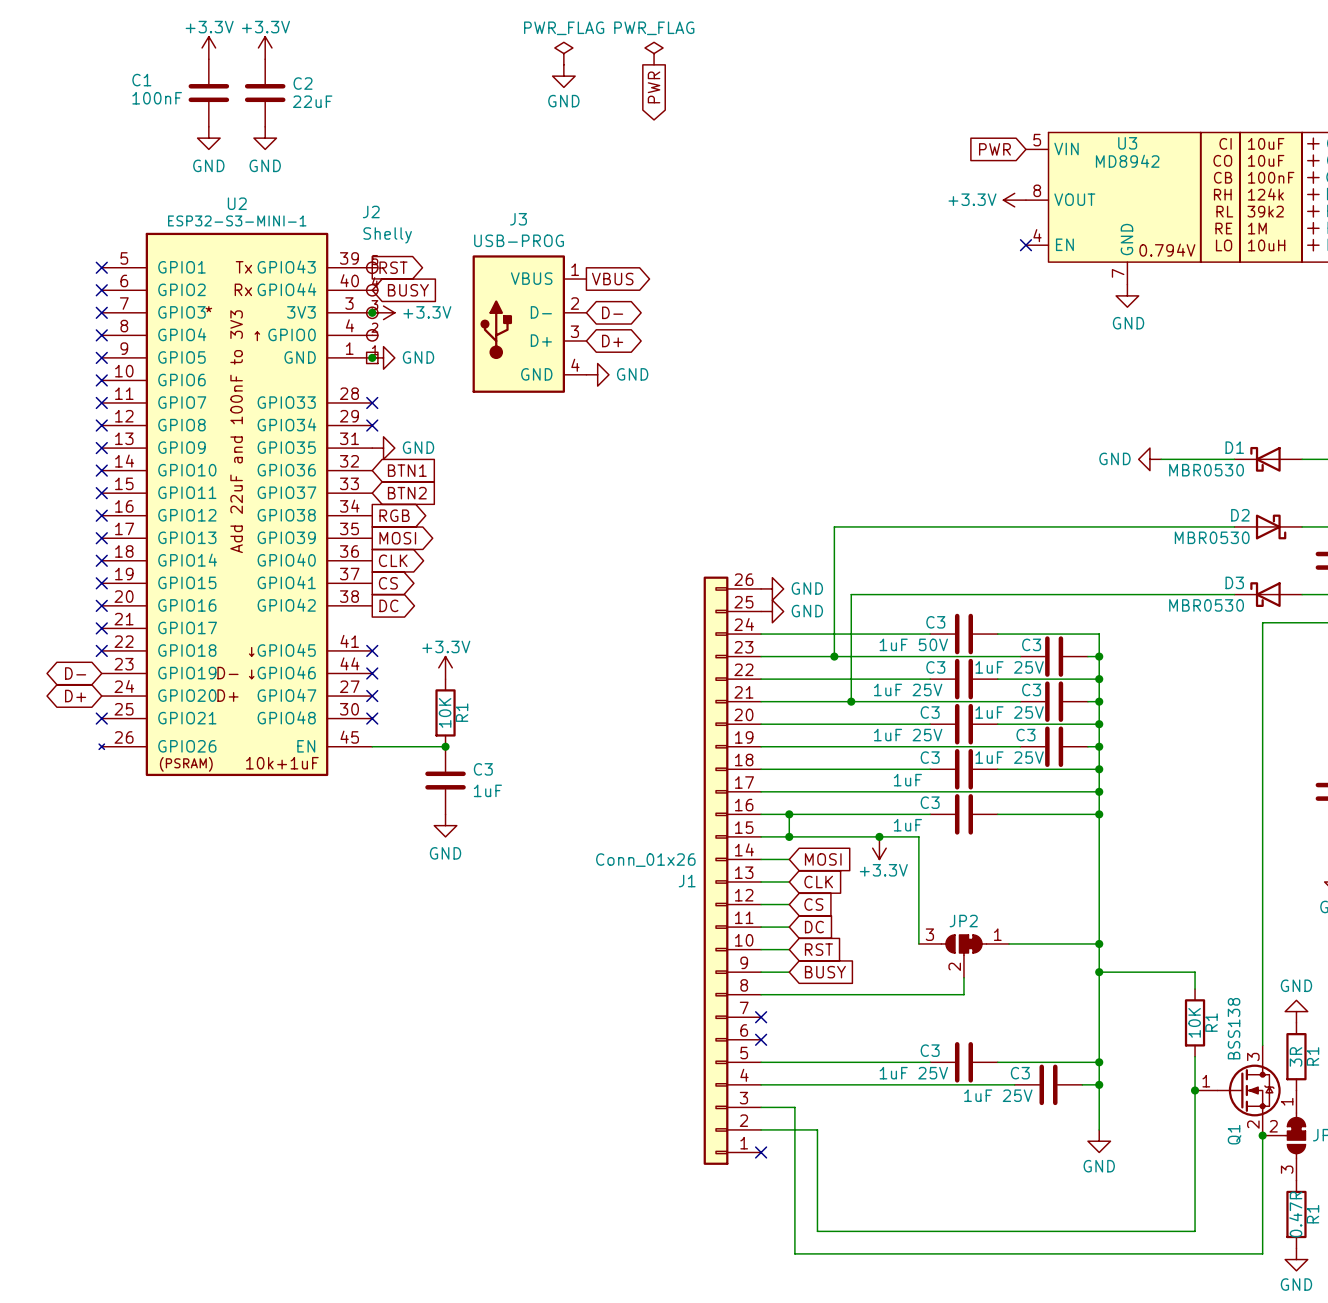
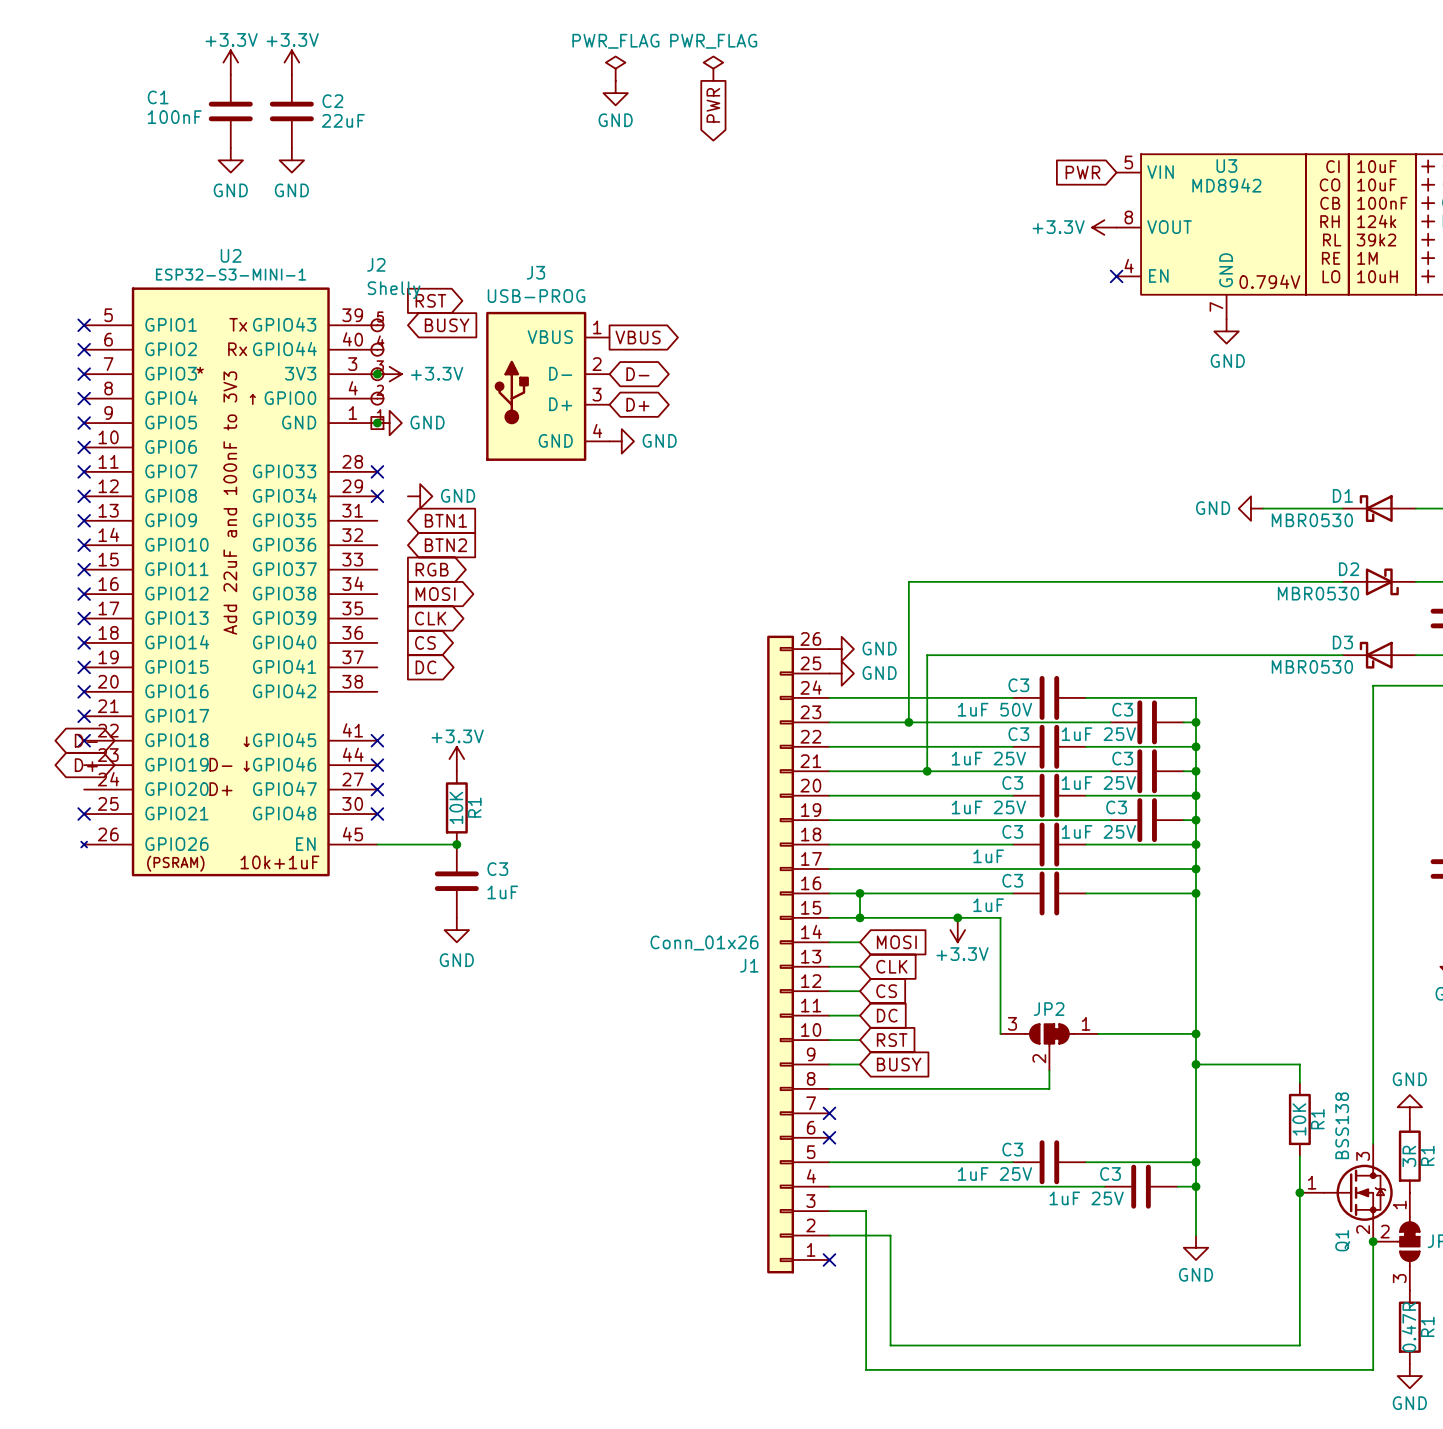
no-connect mark: (101, 267) -> none
global label position: VBUS (612, 279) -> VBUS (638, 337)
no-connect mark: none -> (84, 325)
no-connect mark: (101, 290) -> none
no-connect mark: none -> (84, 349)
no-connect mark: (101, 312) -> none
junction: (372, 312) -> none
J2 position: (372, 312) -> (377, 374)
power symbol position: +3.3V (383, 312) -> +3.3V (389, 374)
global label position: D- (612, 312) -> D- (637, 374)
J3 position: (529, 324) -> (547, 386)
no-connect mark: none -> (84, 374)
no-connect mark: (101, 335) -> none
junction: none -> (377, 374)
global label position: D+ (612, 341) -> D+ (637, 404)
no-connect mark: none -> (84, 398)
no-connect mark: (101, 357) -> none
junction: (372, 357) -> none
power symbol position: GND (383, 357) -> GND (389, 423)
power symbol position: GND (597, 374) -> GND (621, 441)
no-connect mark: none -> (84, 423)
no-connect mark: (101, 380) -> none
junction: none -> (377, 423)
no-connect mark: none -> (84, 447)
no-connect mark: (101, 402) -> none
no-connect mark: (372, 402) -> none
no-connect mark: none -> (84, 471)
no-connect mark: (101, 425) -> none
no-connect mark: none -> (377, 471)
no-connect mark: (372, 425) -> none
no-connect mark: none -> (84, 496)
no-connect mark: (101, 448) -> none
no-connect mark: none -> (377, 496)
no-connect mark: none -> (84, 520)
no-connect mark: (101, 470) -> none
no-connect mark: none -> (84, 545)
no-connect mark: (101, 493) -> none
U2 position: (235, 504) -> (229, 581)
no-connect mark: none -> (84, 569)
no-connect mark: (101, 515) -> none
no-connect mark: none -> (84, 594)
no-connect mark: (101, 538) -> none
no-connect mark: none -> (84, 618)
no-connect mark: (101, 560) -> none
no-connect mark: none -> (84, 642)
no-connect mark: (101, 583) -> none
no-connect mark: none -> (84, 667)
no-connect mark: (101, 605) -> none
no-connect mark: none -> (84, 691)
no-connect mark: (101, 628) -> none
no-connect mark: none -> (84, 716)
no-connect mark: (101, 650) -> none
no-connect mark: (372, 650) -> none
power symbol position: +3.3V (445, 667) -> +3.3V (456, 759)
no-connect mark: none -> (84, 740)
no-connect mark: none -> (377, 740)
no-connect mark: (372, 673) -> none
no-connect mark: none -> (377, 765)
no-connect mark: (372, 696) -> none
R1 position: (445, 712) -> (456, 807)
no-connect mark: (101, 718) -> none
no-connect mark: none -> (377, 789)
no-connect mark: (372, 718) -> none
no-connect mark: none -> (84, 814)
no-connect mark: none -> (377, 814)
wire: (372, 746) (445, 746) -> (377, 844) (456, 844)
junction position: (445, 746) -> (456, 844)
C3 position: (445, 780) -> (456, 881)
power symbol position: GND (445, 825) -> GND (456, 930)

